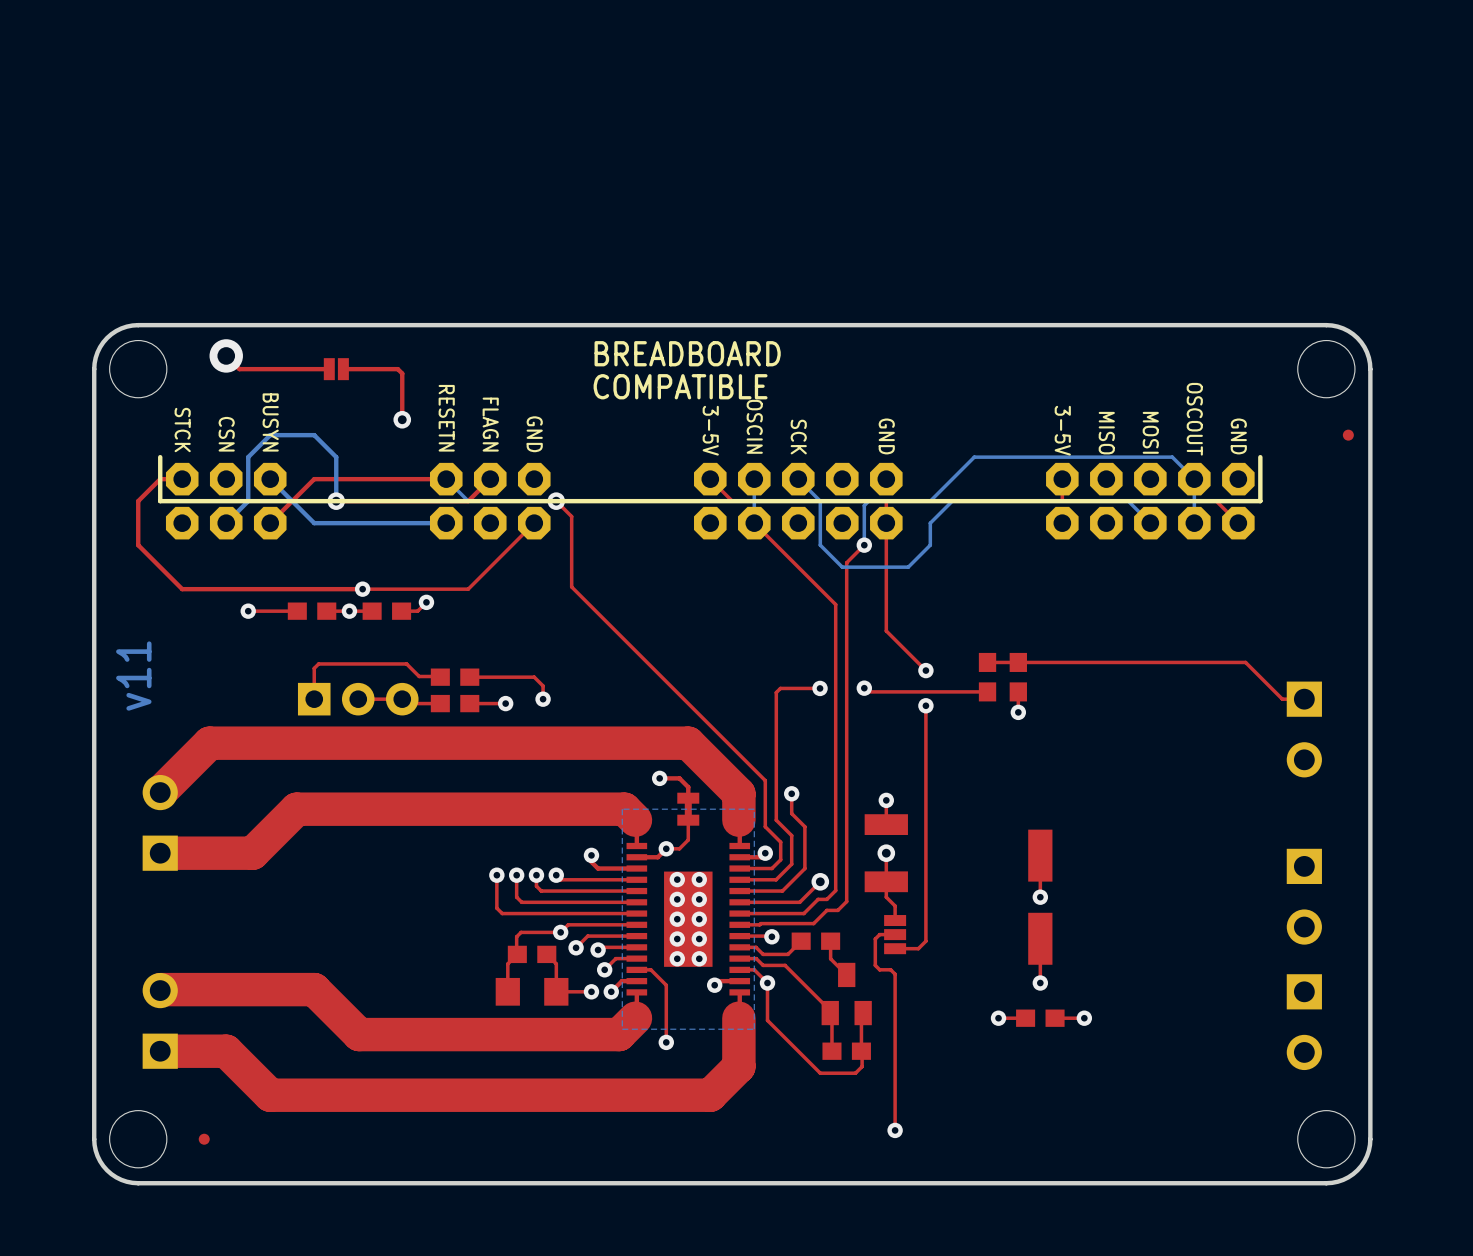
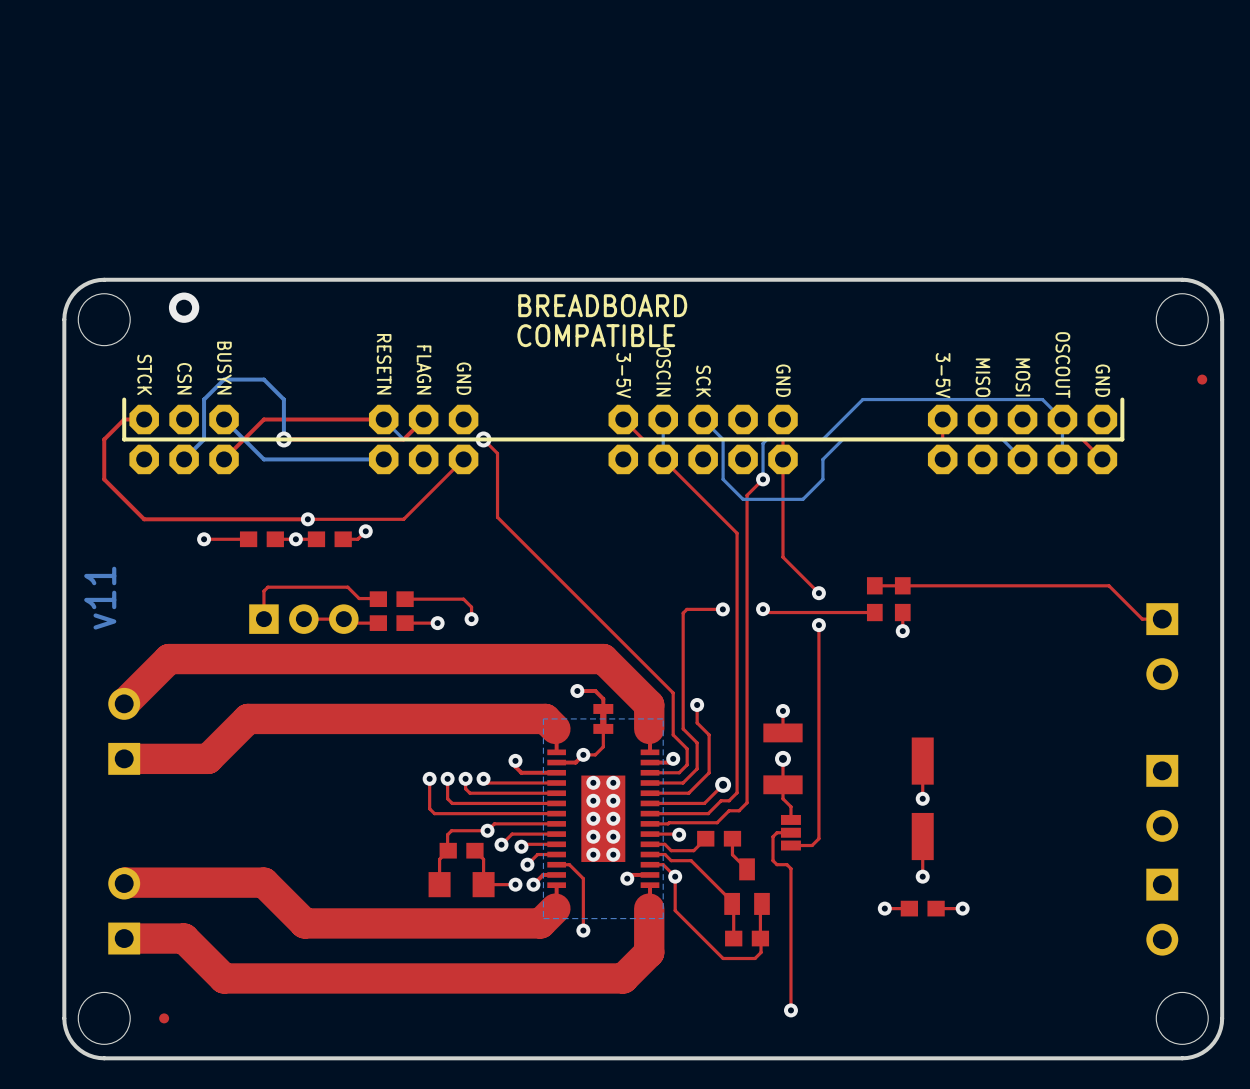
top track: (226, 355) (239, 369) (329, 369) -> none
part: (336, 369) -> none
top track: (343, 369) (397, 369) (402, 373) (402, 419) -> none
via: (402, 419) -> none

